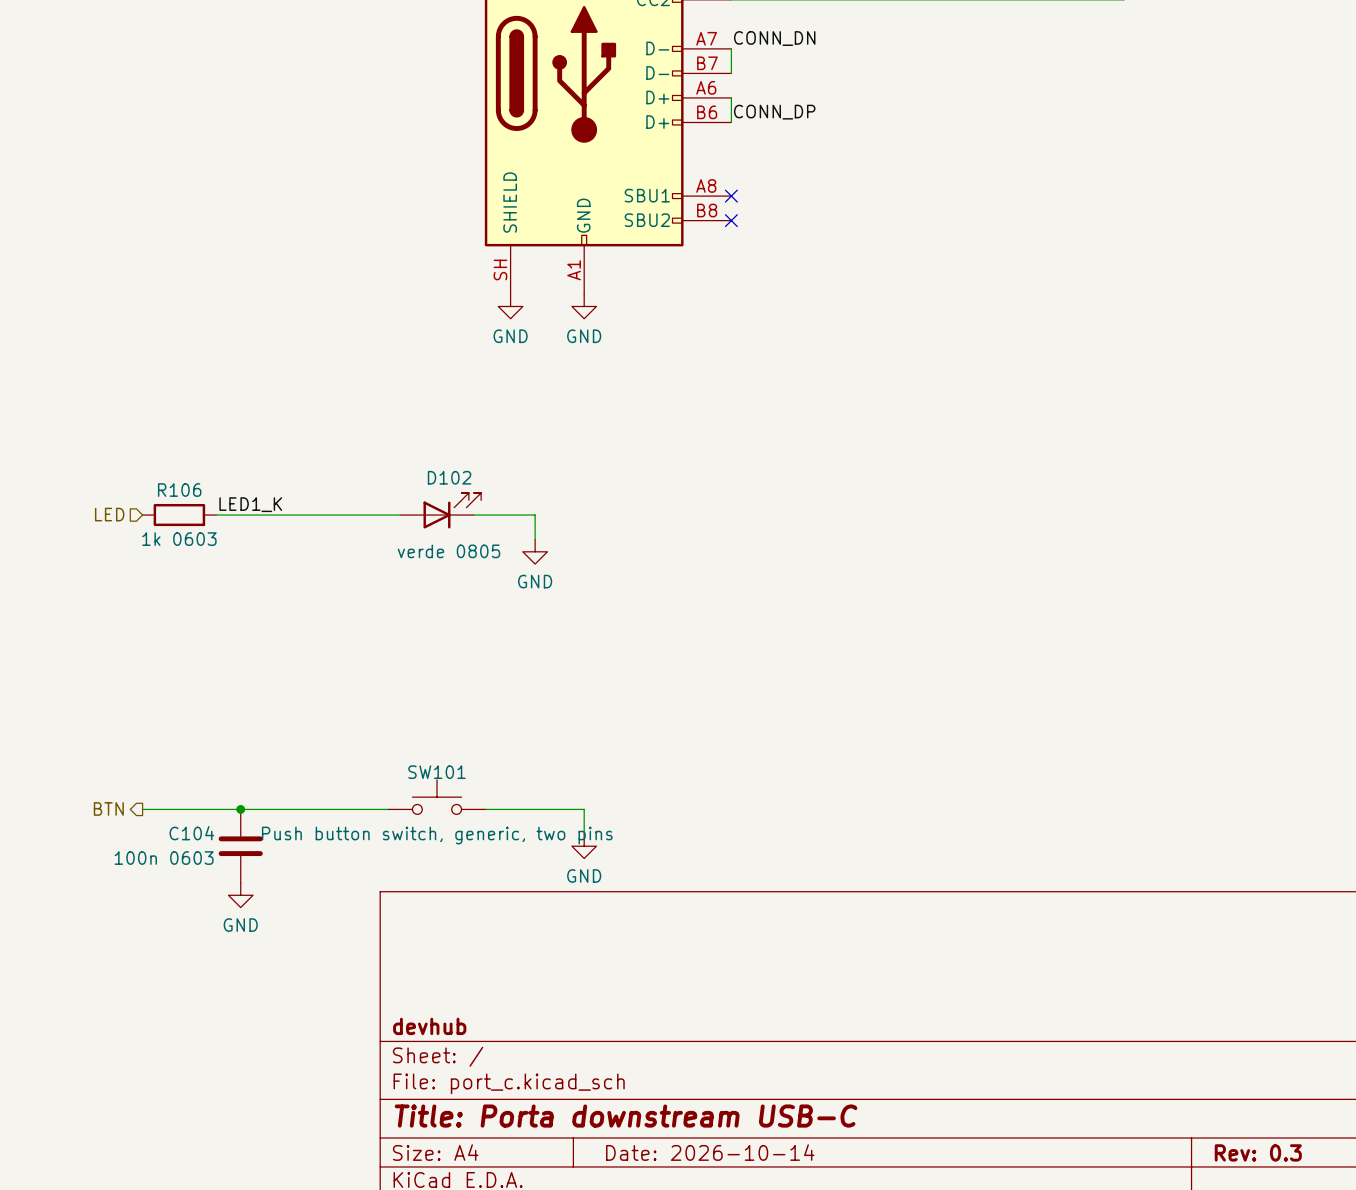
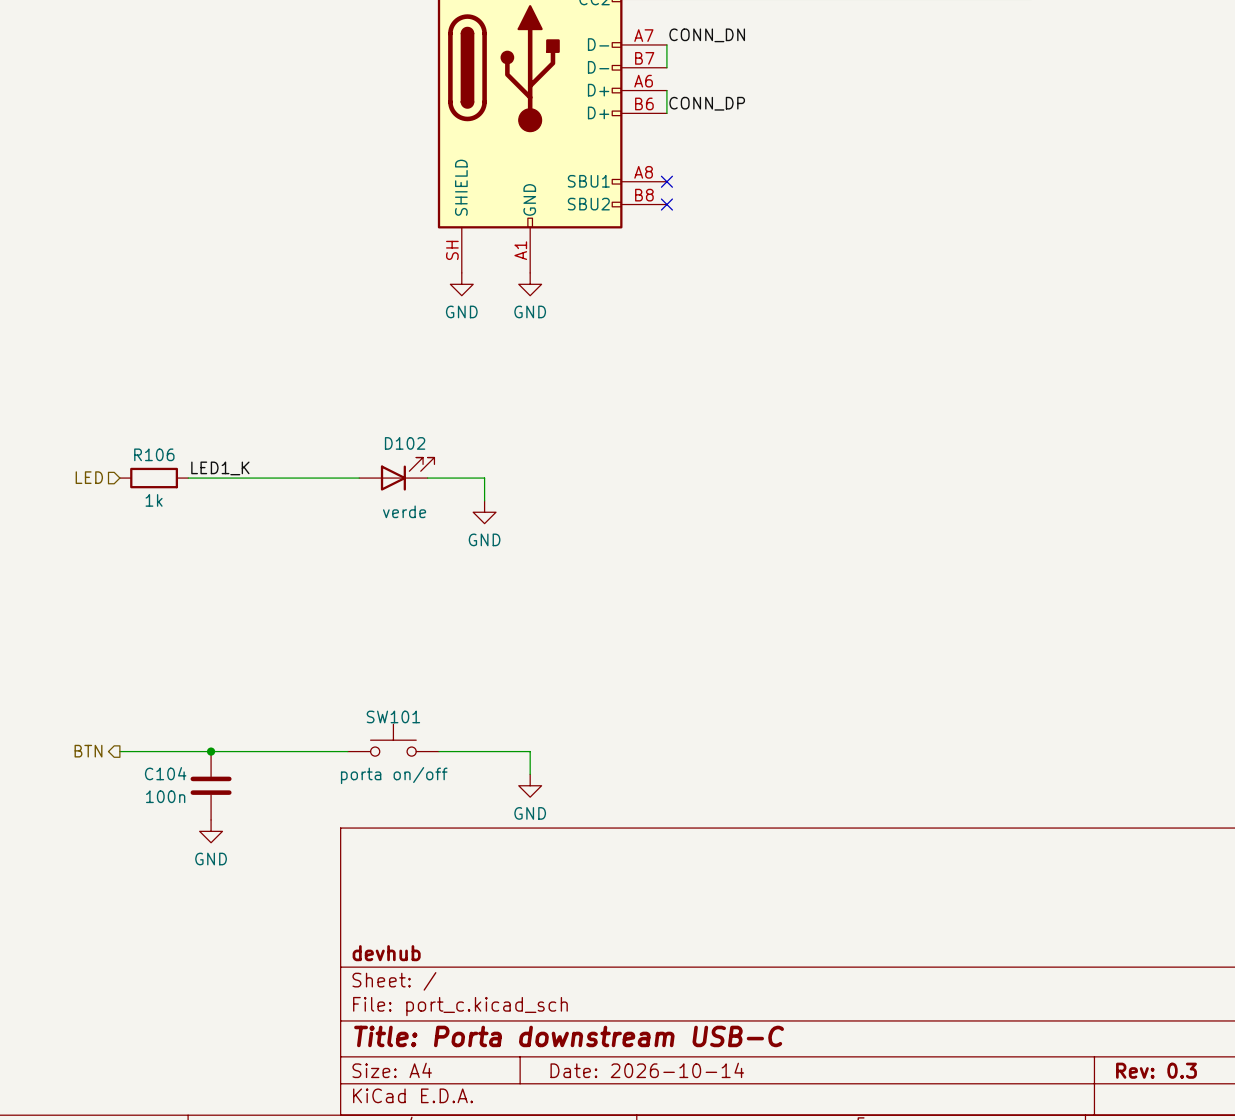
R106 value: 1k 0603 (179, 539) -> 1k (154, 500)
D102 value: verde 0805 (448, 551) -> verde (404, 511)
SW101 value: Push button switch, generic, two pins (437, 835) -> porta on/off (394, 775)
C104 value: 100n 0603 (164, 858) -> 100n (165, 796)

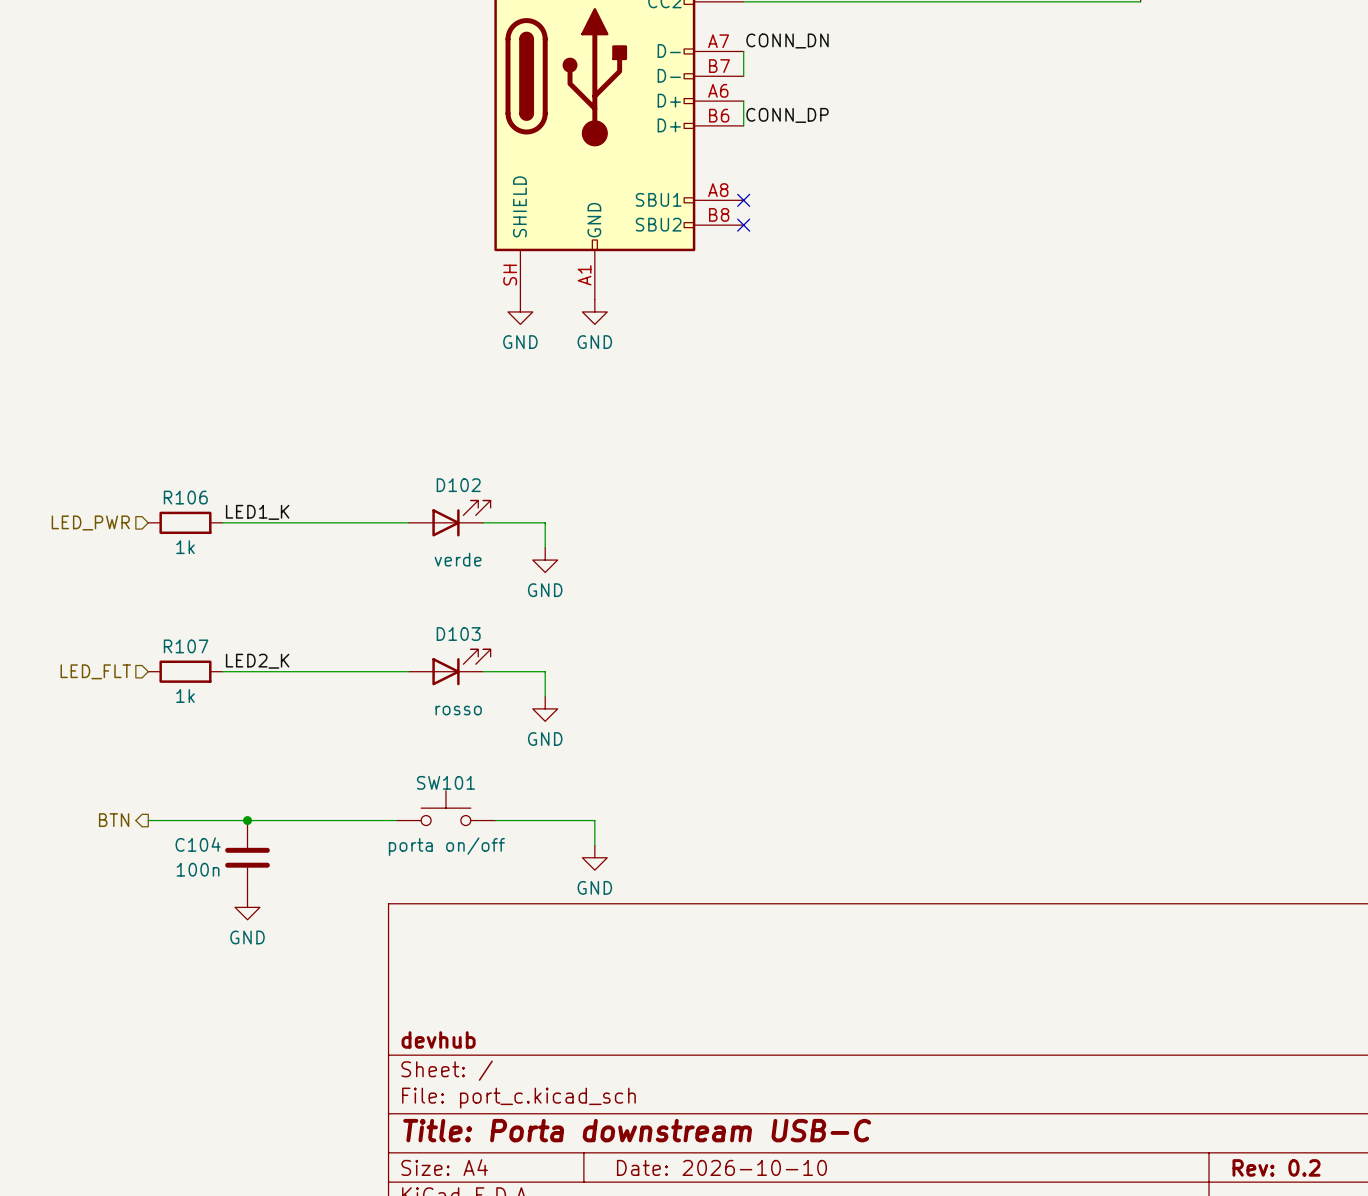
hierarchical label: LED (89, 477) -> LED_PWR (90, 522)
label: none -> LED2_K (257, 661)
D103: none -> rosso (449, 667)
hierarchical label: none -> LED_FLT (95, 671)
R107: none -> 1k (185, 671)
wire: none -> (222, 671) (408, 671)
wire: none -> (483, 671) (545, 671) (545, 696)
power symbol: none -> GND (545, 708)
title block: Date: 2026-10-14 (647, 1070) -> Date: 2026-10-10 (721, 1167)
title block: Rev: 0.3 (1156, 1070) -> Rev: 0.2 (1276, 1167)

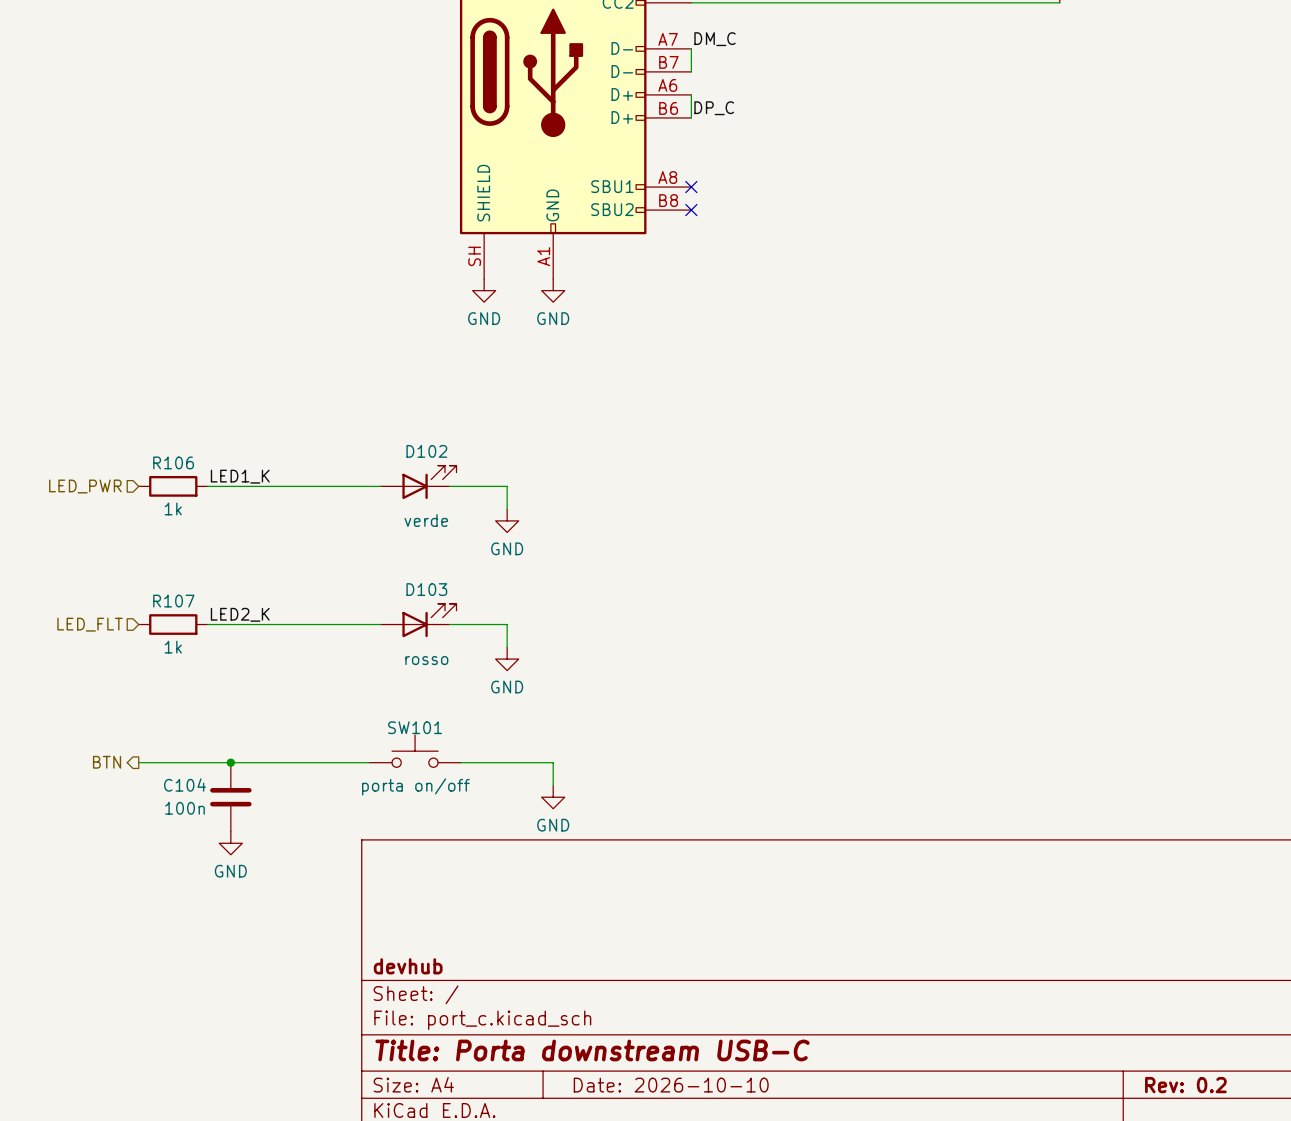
label: CONN_DN (787, 40) -> DM_C (715, 39)
label: CONN_DP (787, 115) -> DP_C (714, 108)

